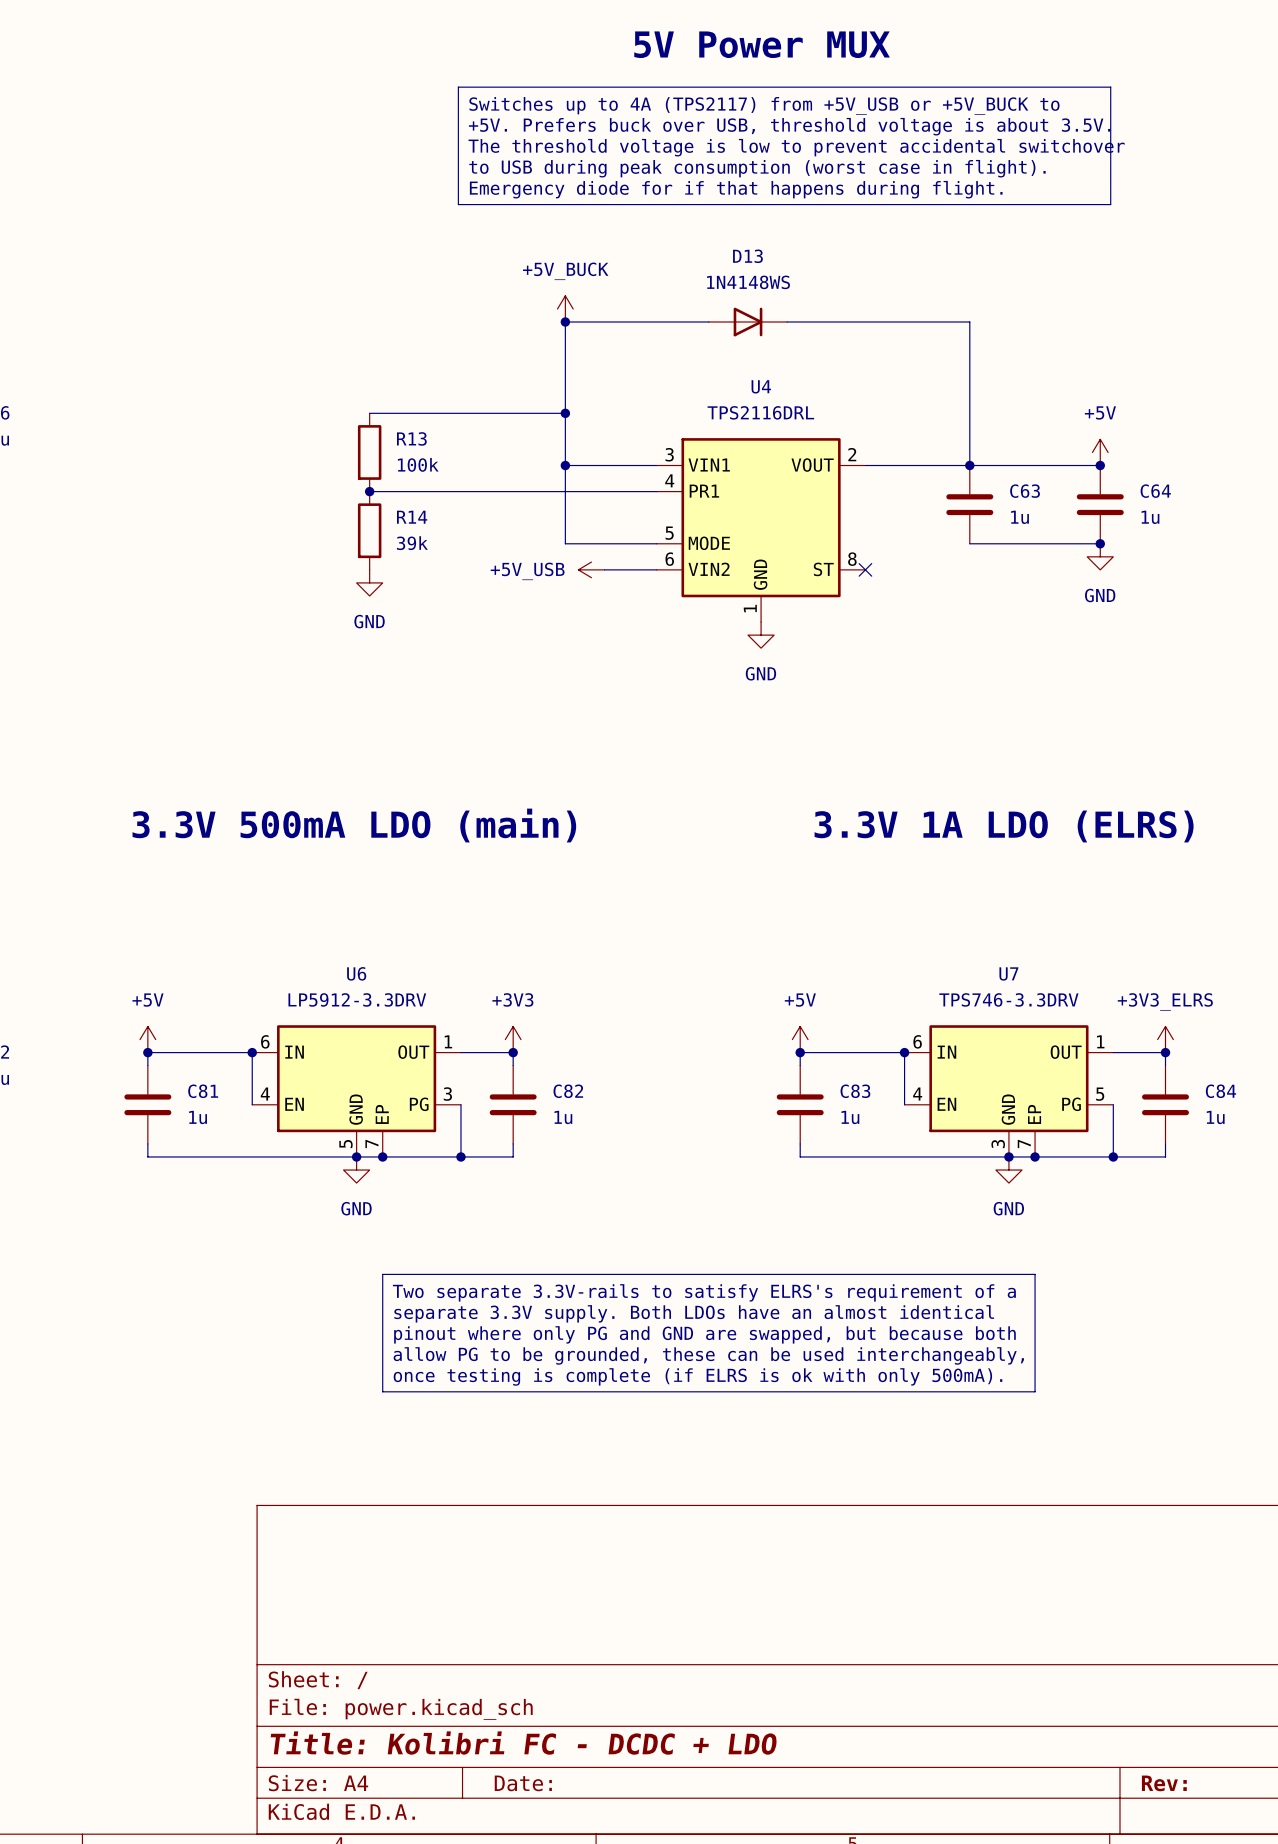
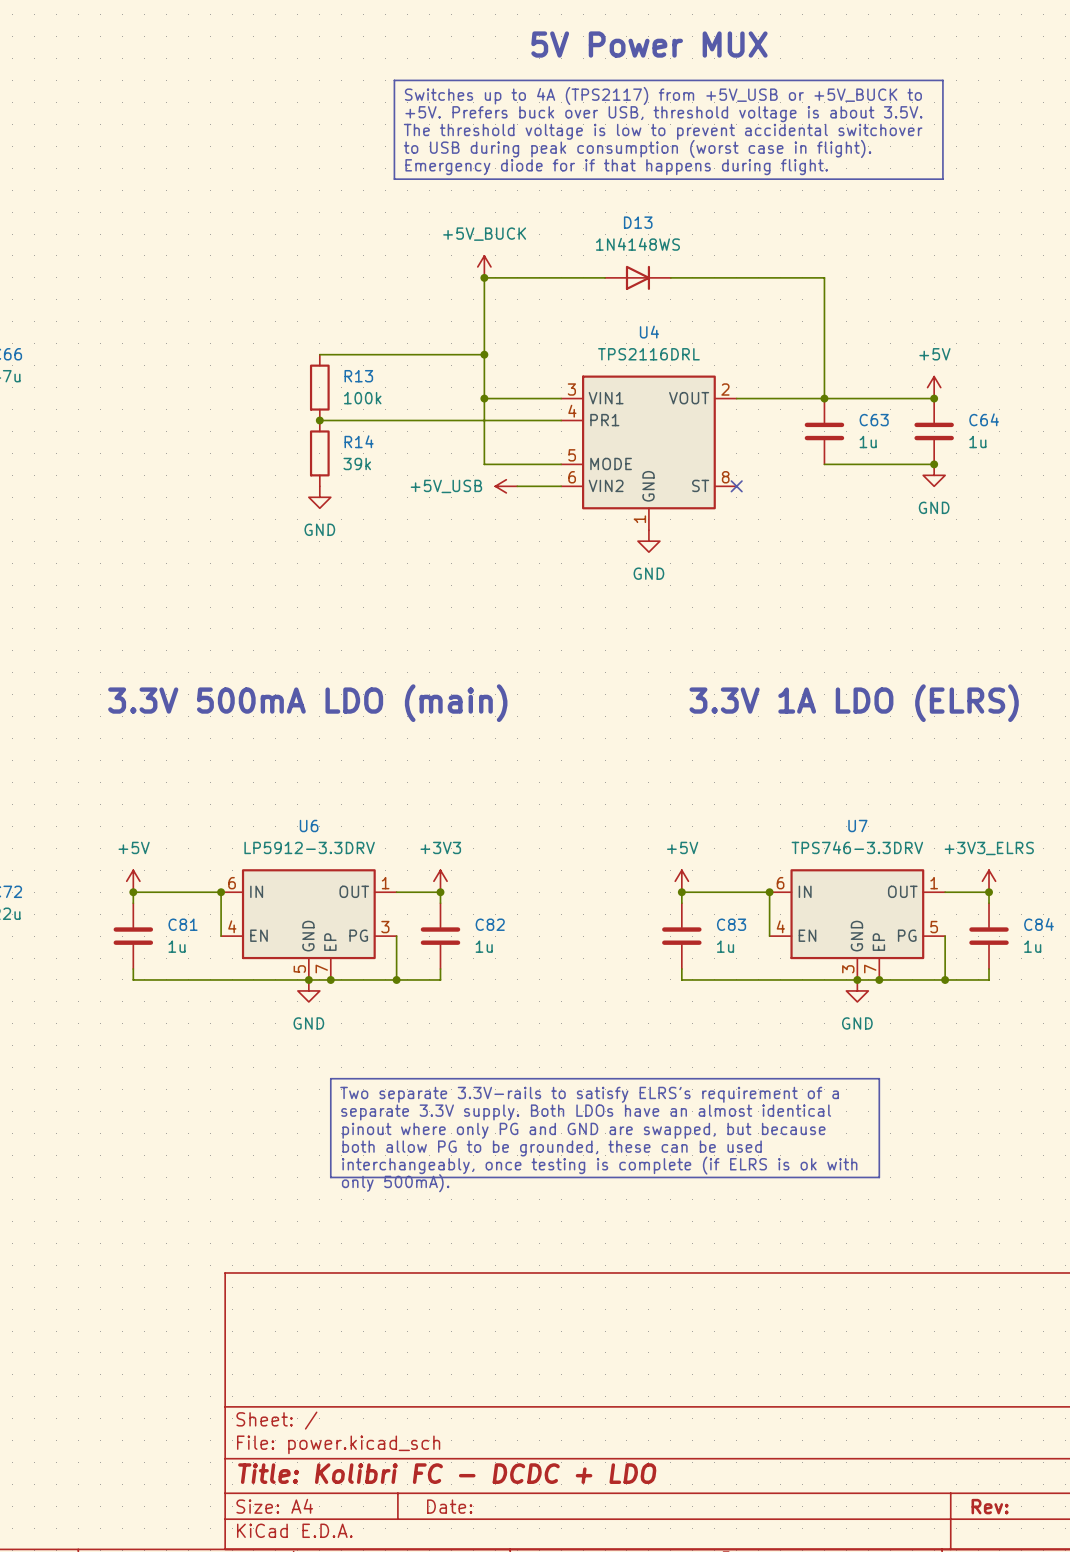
text: pinout where only PG and GND are swapped, but because both (704, 1334) -> pinout where only PG and GND are swapped, but because (583, 1130)
text: allow PG to be grounded, these can be used interchangeably, (708, 1355) -> both allow PG to be grounded, these can be used (552, 1148)
text: once testing is complete (if ELRS is ok with only 500mA). (697, 1376) -> interchangeably, once testing is complete (if ELRS is ok with (599, 1165)
text: none -> only 500mA). (395, 1183)

